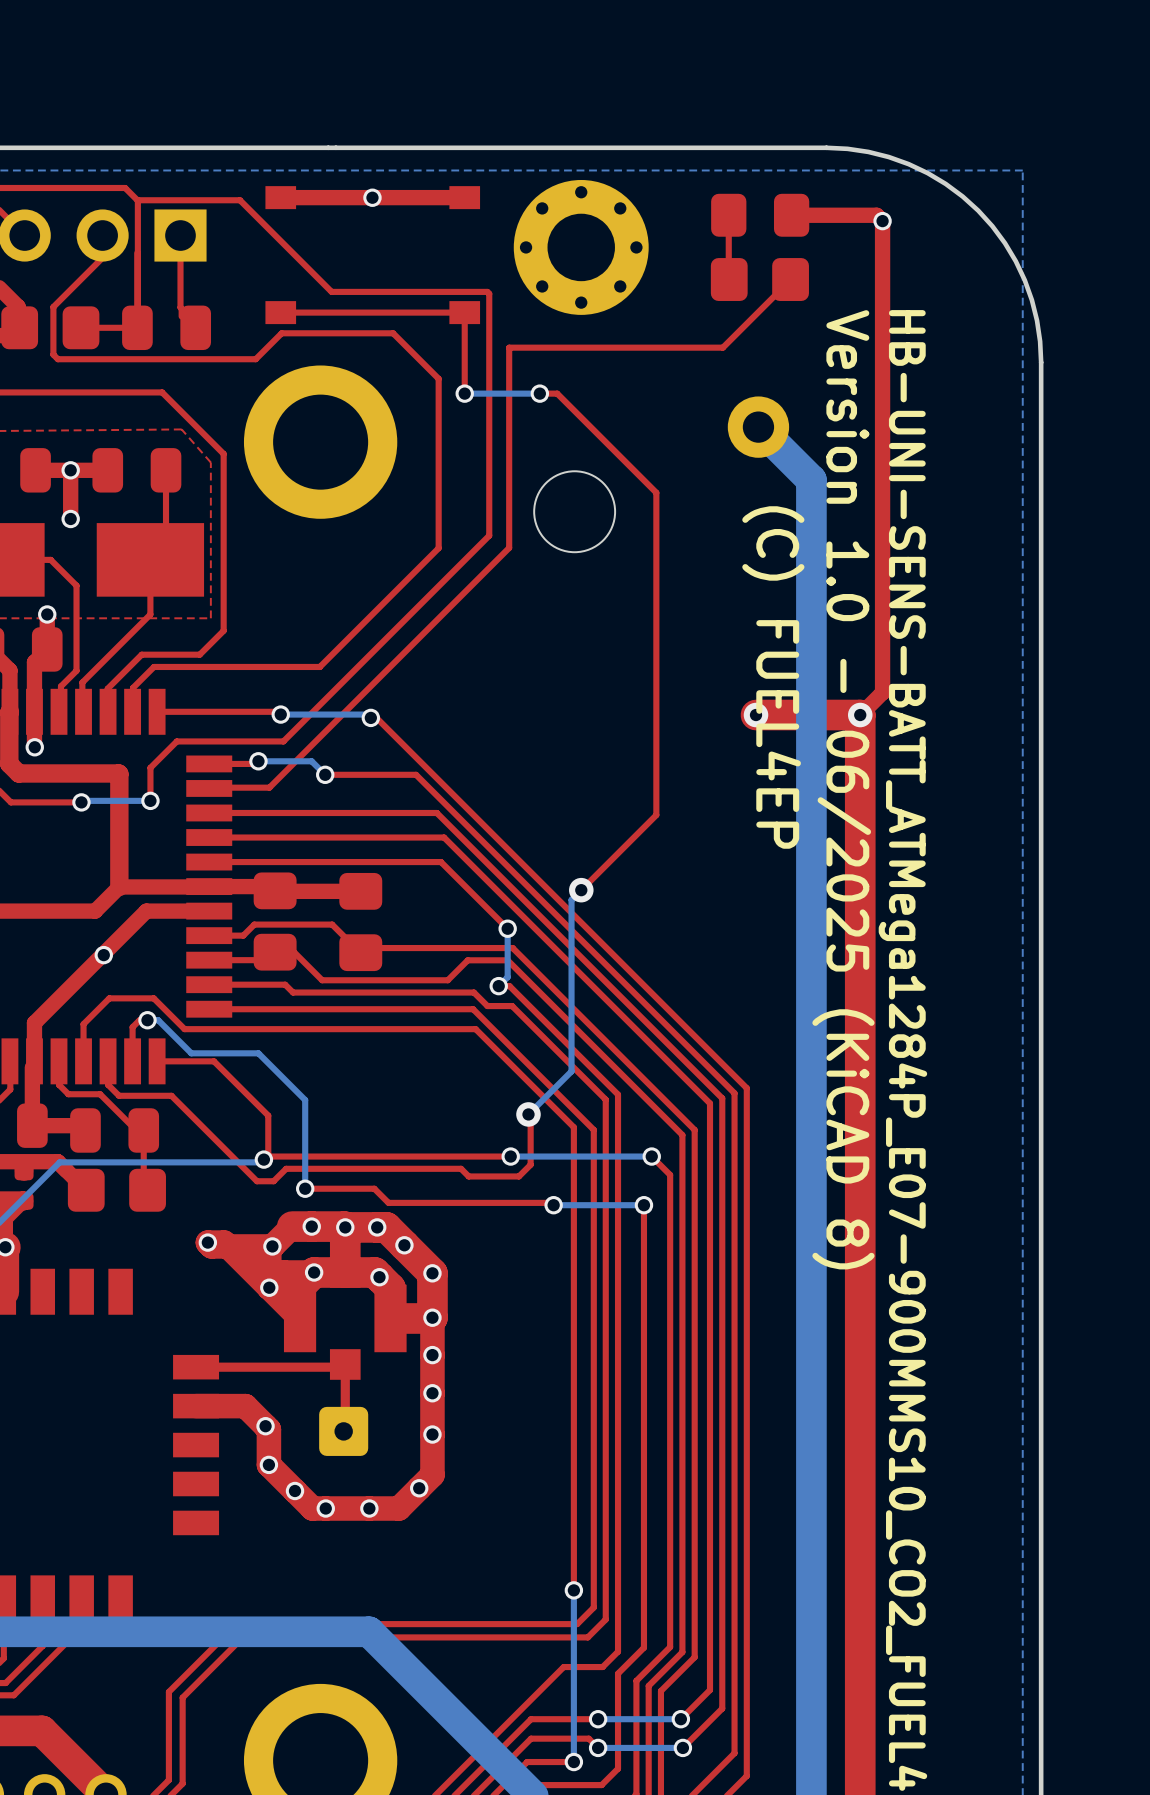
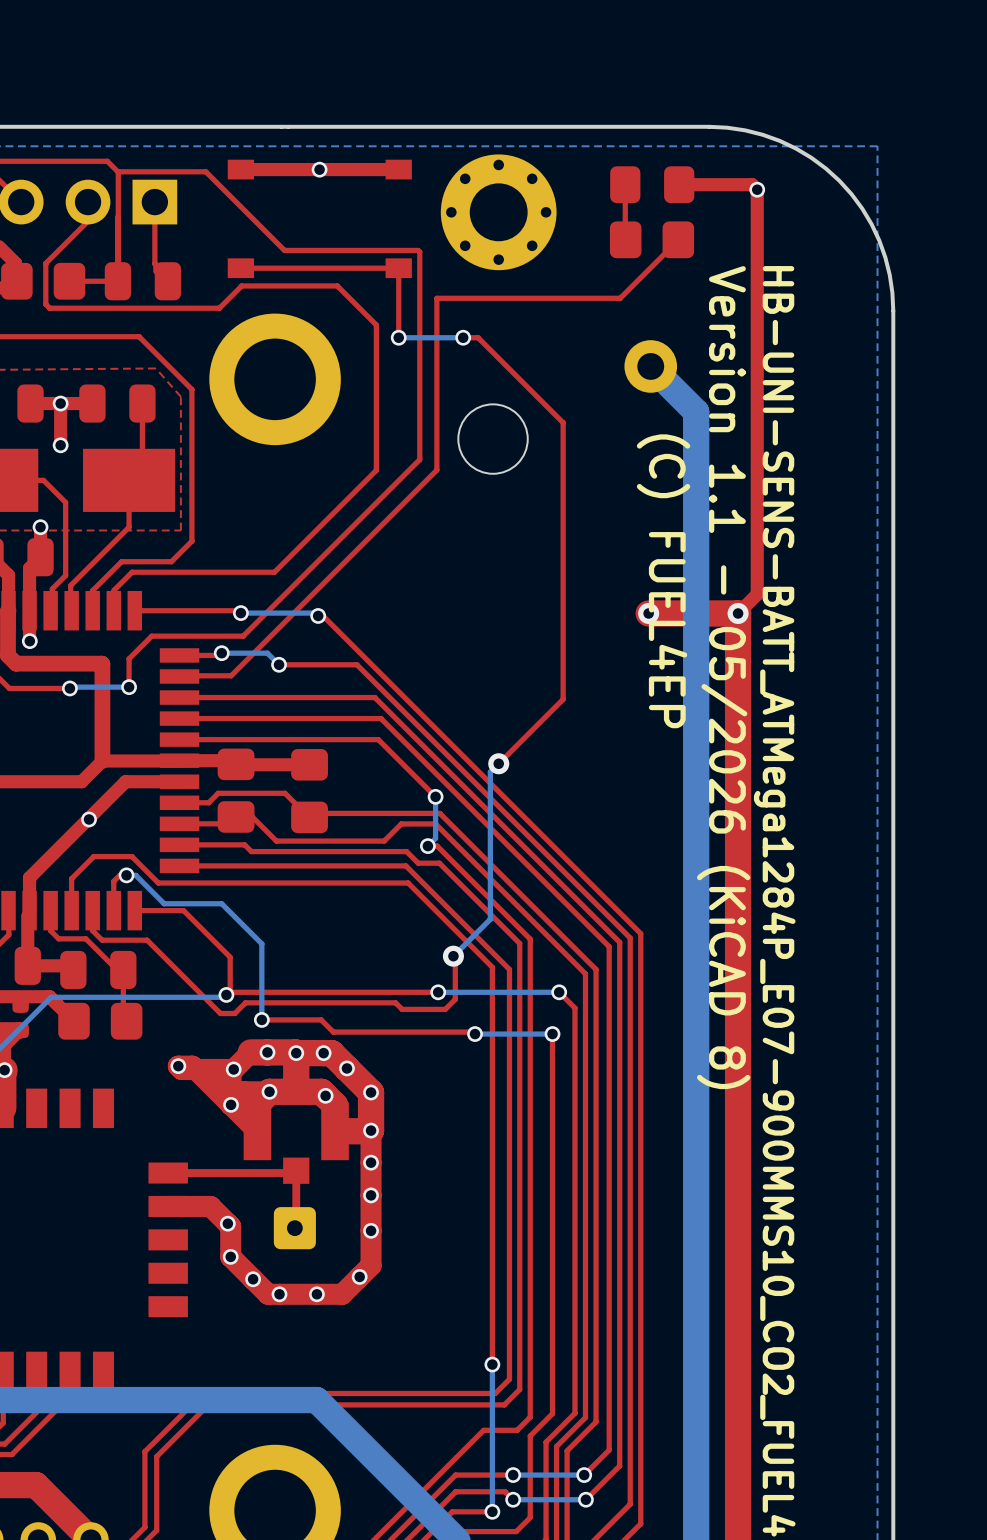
text: Version 1.0 - 06/2025 (KiCAD 8) (843, 789) -> Version 1.1 - 05/2026 (KiCAD 8) (723, 677)

